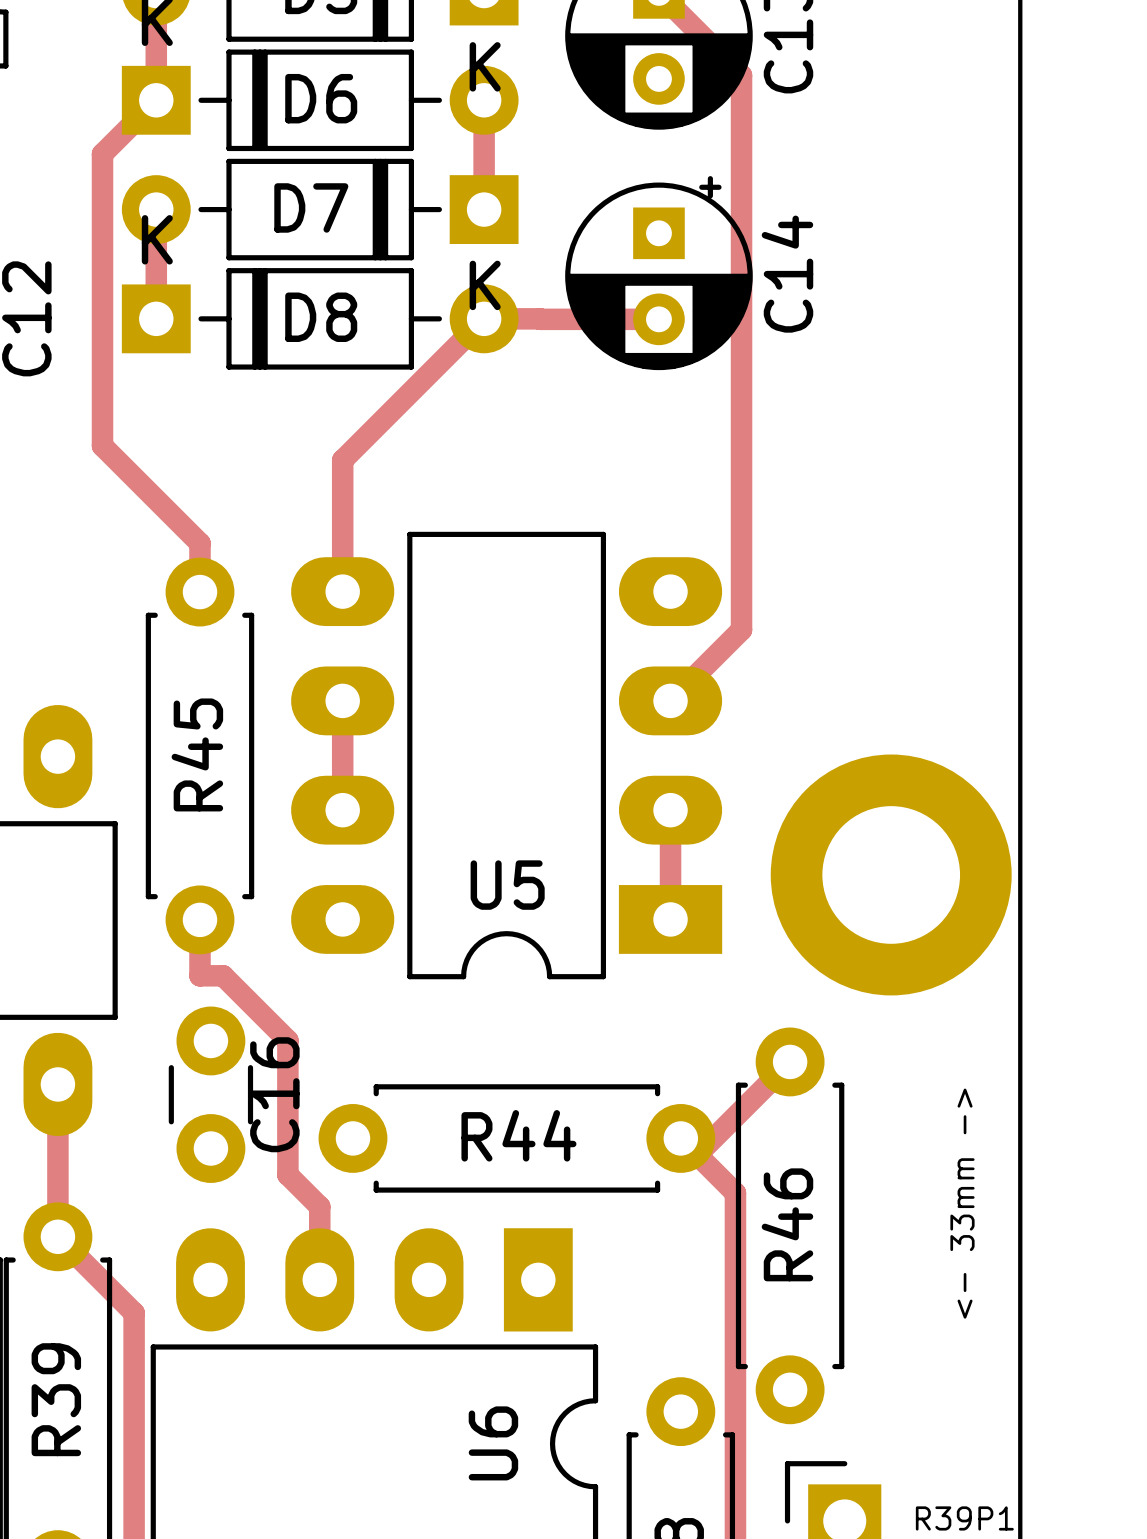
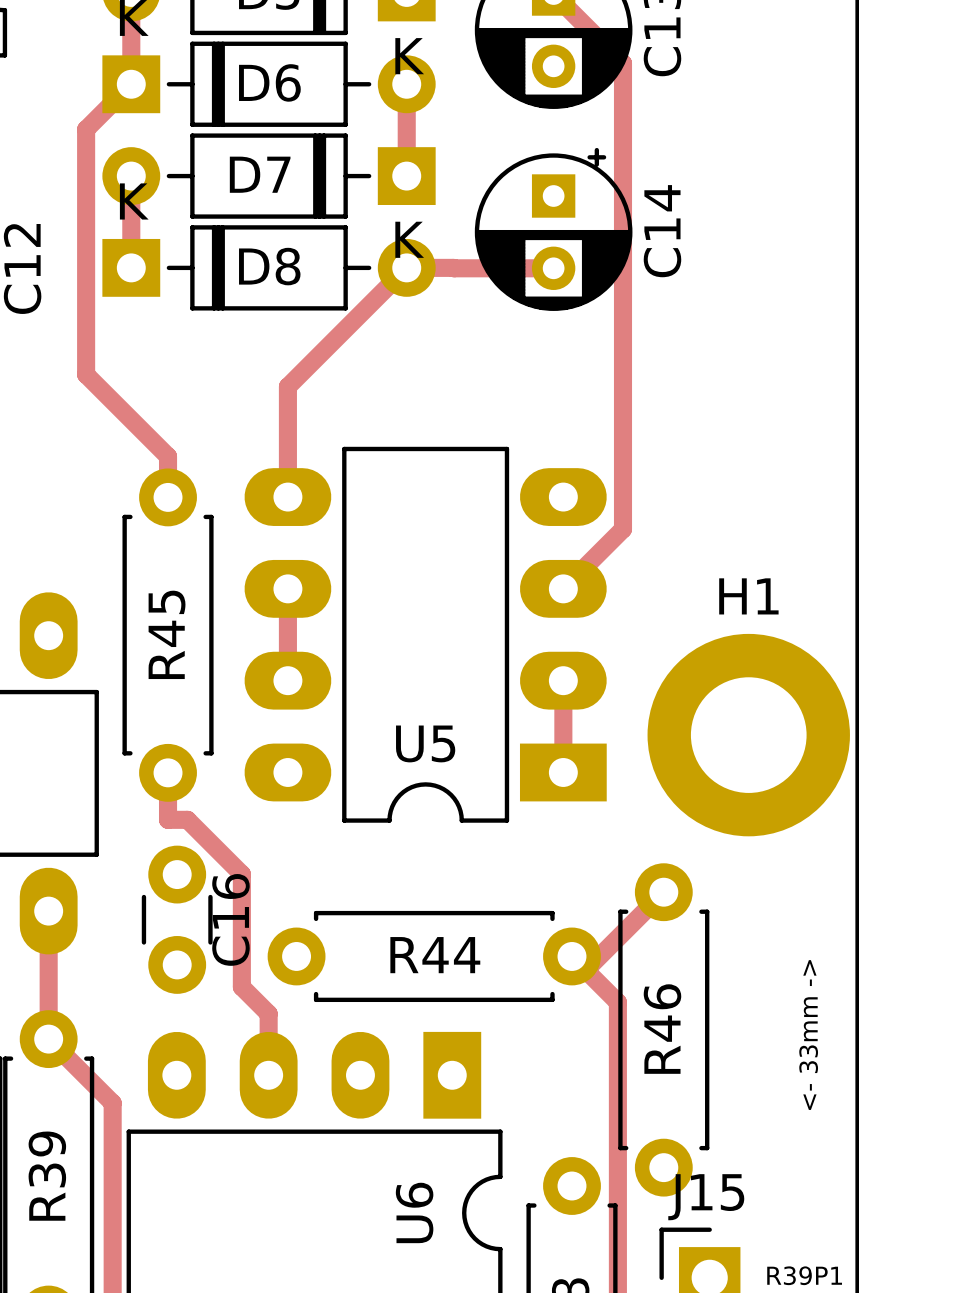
H1 name: none -> H1 (748, 596)
J15 name: none -> J15 (706, 1197)

